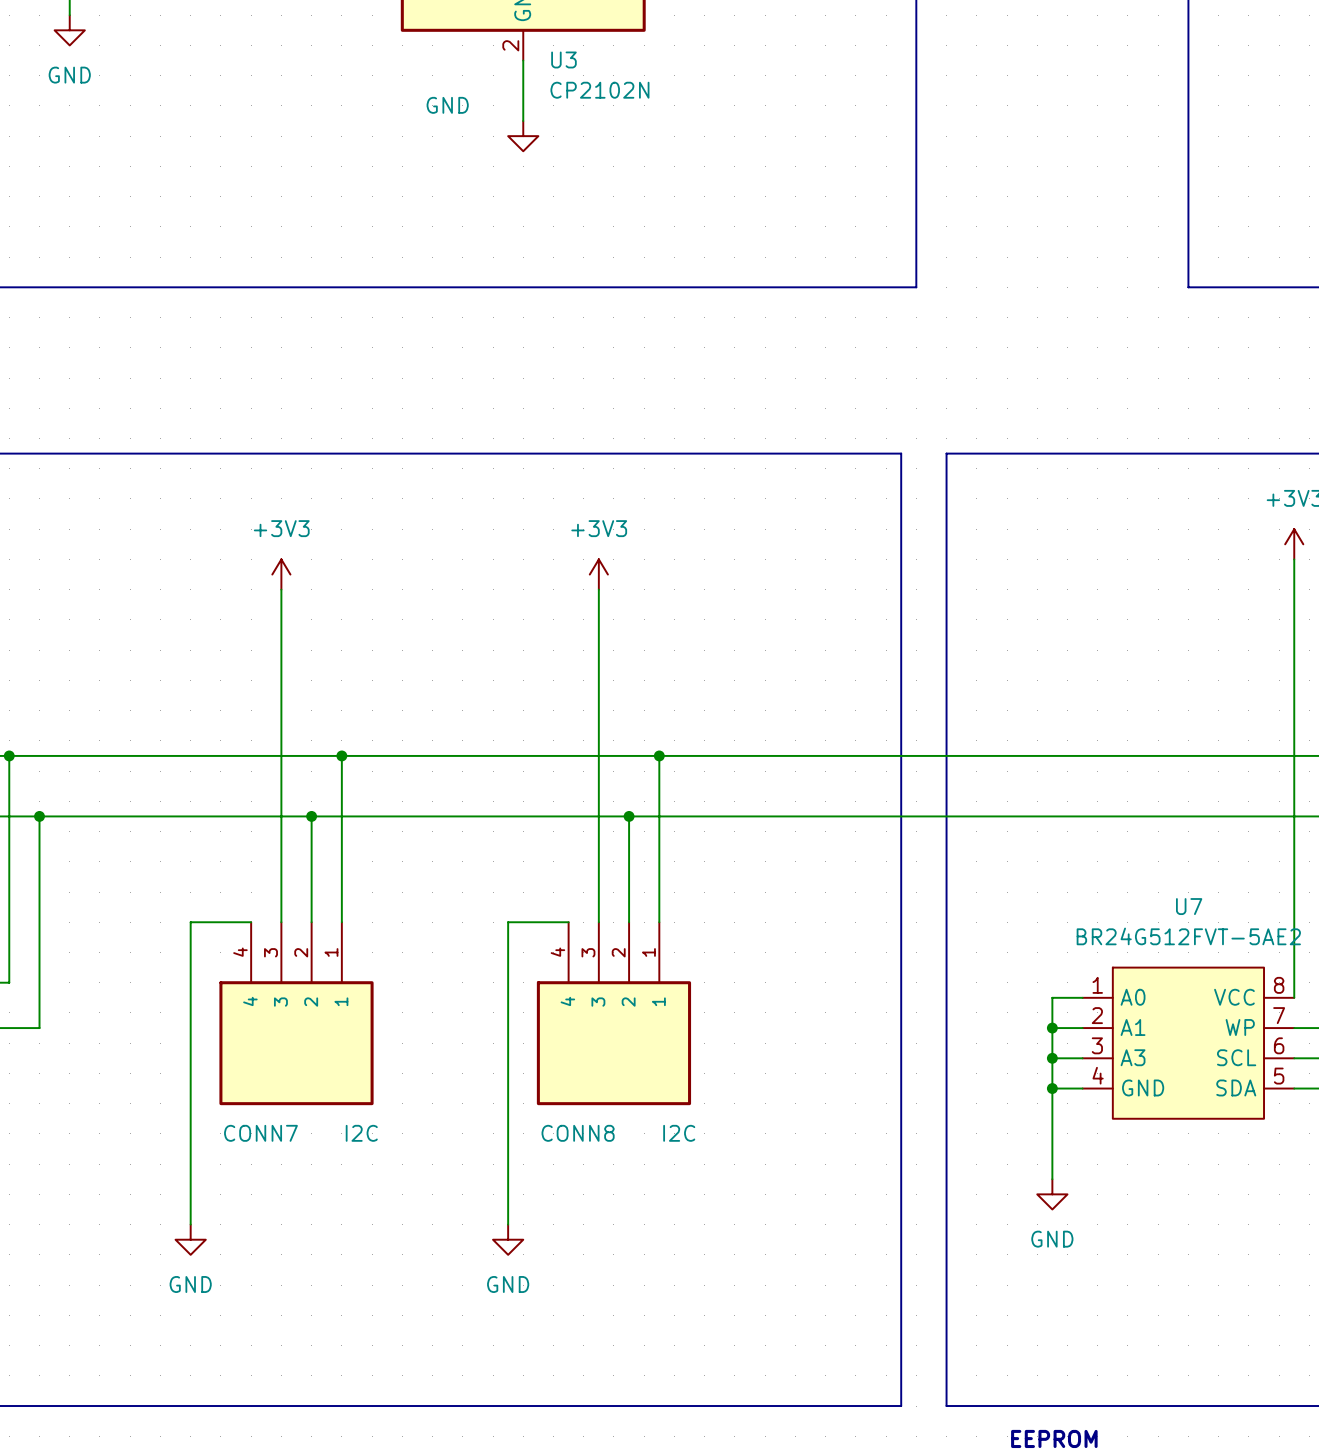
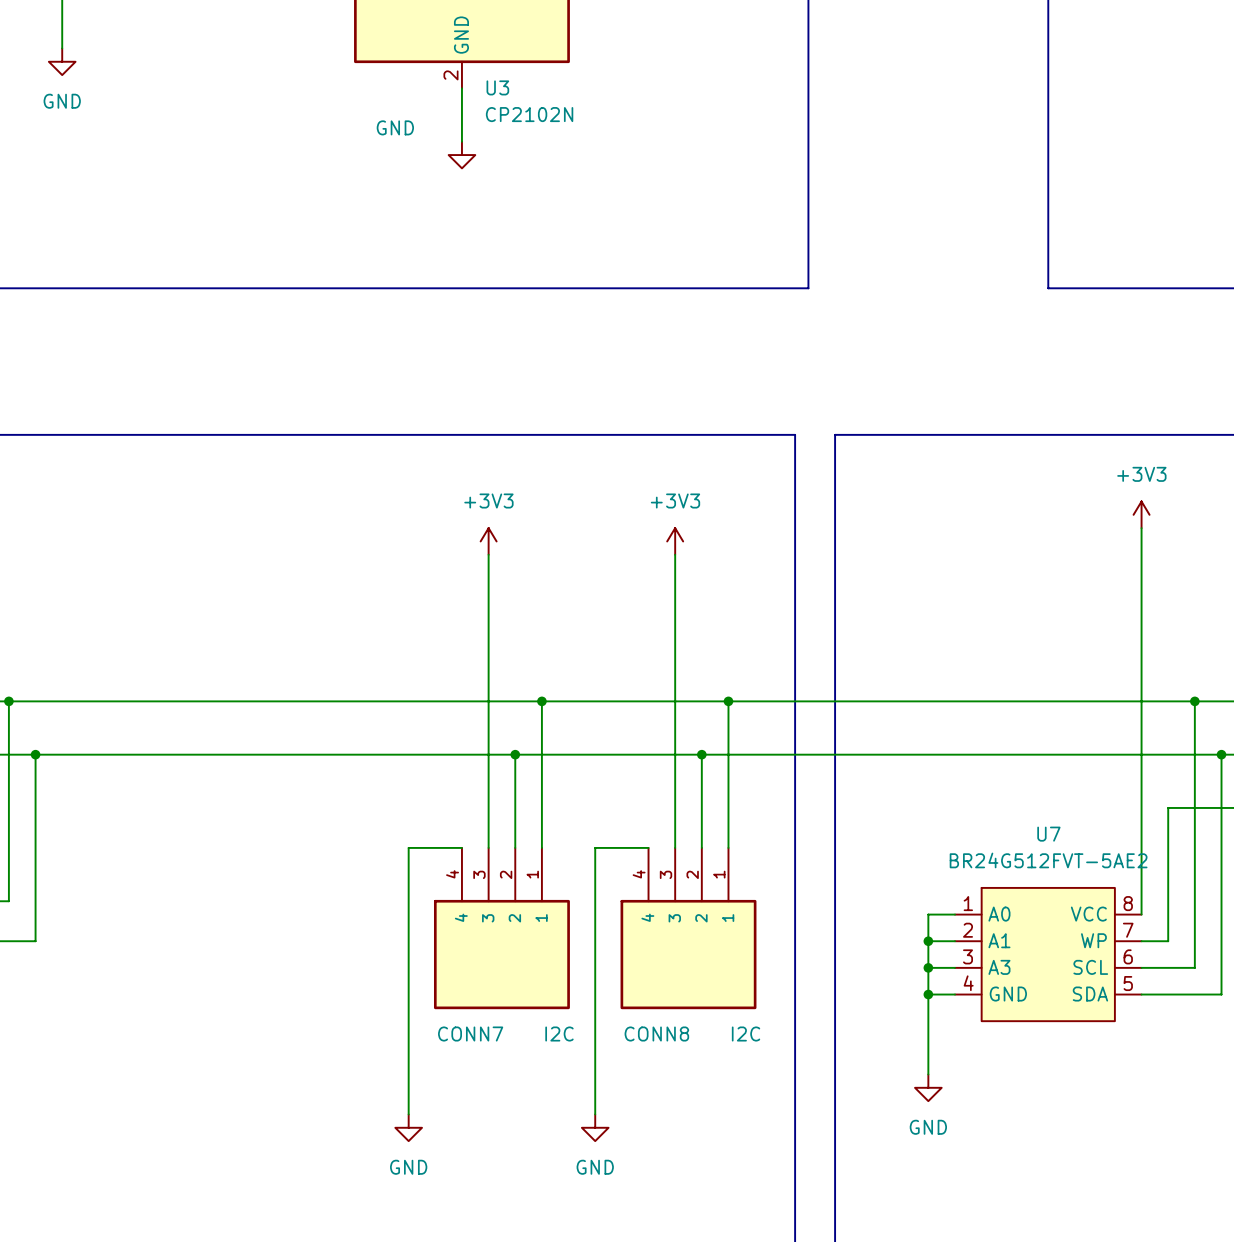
power symbol: +3V3 (281, 574) -> none
power symbol position: +3V3 (598, 574) -> +3V3 (488, 541)
power symbol: none -> +3V3 (675, 541)
wire: (281, 589) (281, 922) -> none
wire: (598, 589) (598, 922) -> (488, 554) (488, 847)
wire: none -> (675, 554) (675, 847)
wire: (341, 755) (341, 922) -> none
junction: (341, 755) -> none
junction: none -> (541, 701)
wire: (659, 755) (659, 922) -> (541, 701) (541, 847)
junction: (659, 755) -> none
wire: none -> (728, 701) (728, 847)
junction: none -> (728, 701)
wire: (311, 816) (311, 922) -> none
junction: (311, 816) -> none
junction: none -> (515, 754)
wire: (629, 816) (629, 922) -> (515, 754) (515, 847)
junction: (629, 816) -> none
wire: none -> (701, 754) (701, 847)
junction: none -> (701, 754)
wire: (251, 922) (190, 922) (190, 1224) -> none
wire: (508, 922) (508, 1224) -> (448, 847) (408, 847) (408, 1114)
wire: (523, 922) (568, 922) -> none
wire: none -> (648, 847) (595, 847) (595, 1114)
CONN7 position: (296, 1013) -> (501, 928)
CONN8 position: (613, 1013) -> (688, 928)
power symbol: GND (190, 1239) -> none
power symbol position: GND (508, 1239) -> GND (408, 1127)
power symbol: none -> GND (595, 1127)

